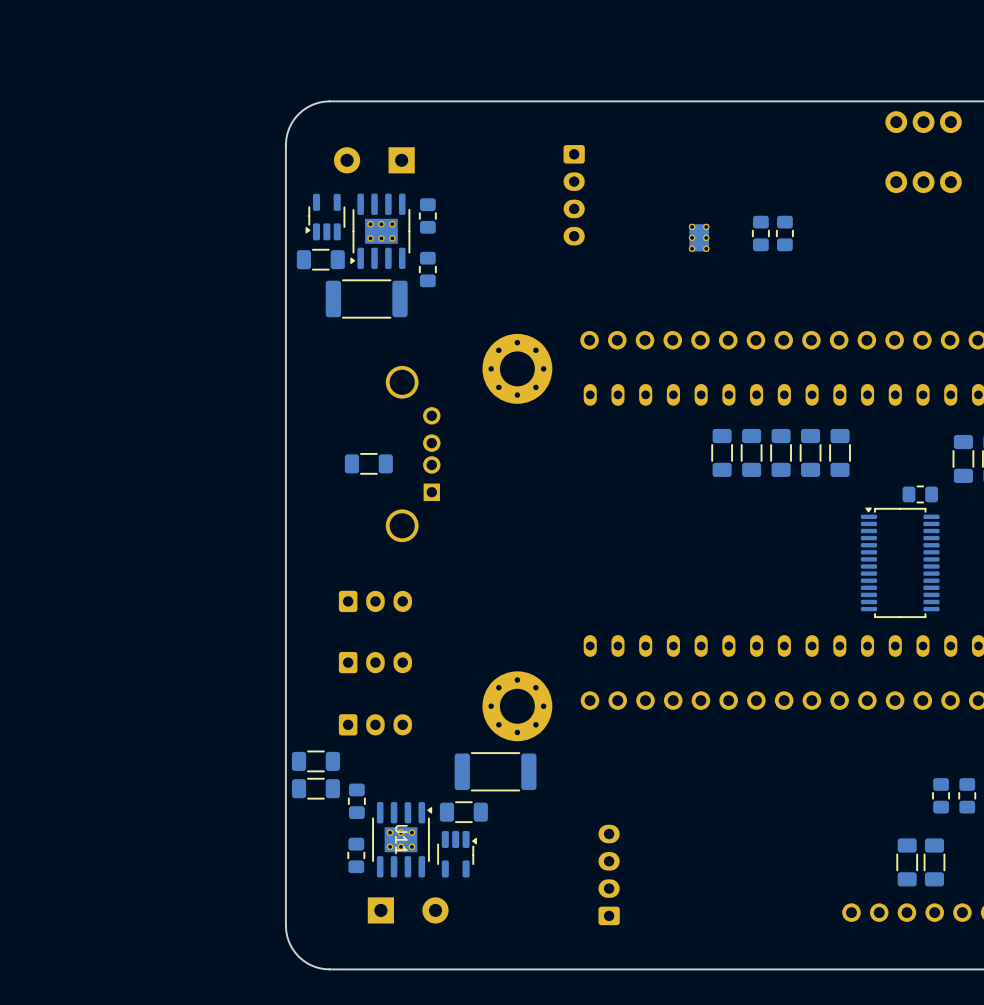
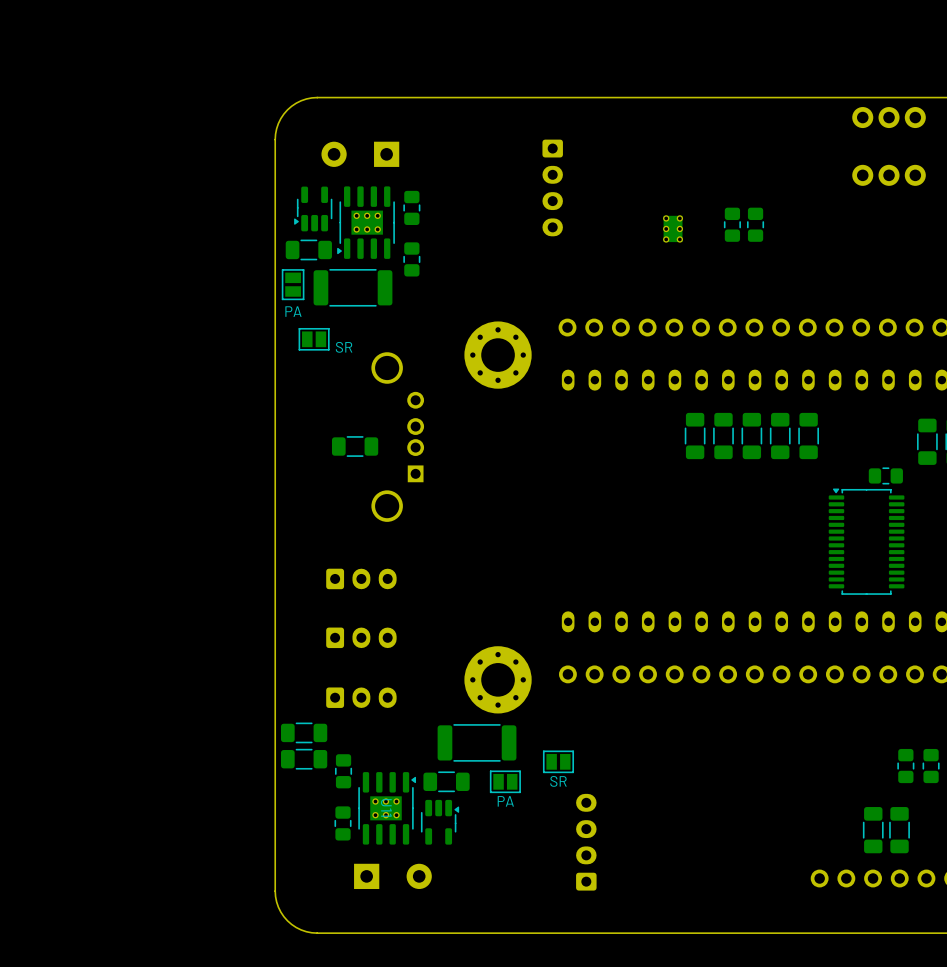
part: none -> PA (293, 284)
part: none -> SR (314, 339)
part: none -> SR (558, 761)
part: none -> PA (505, 781)

